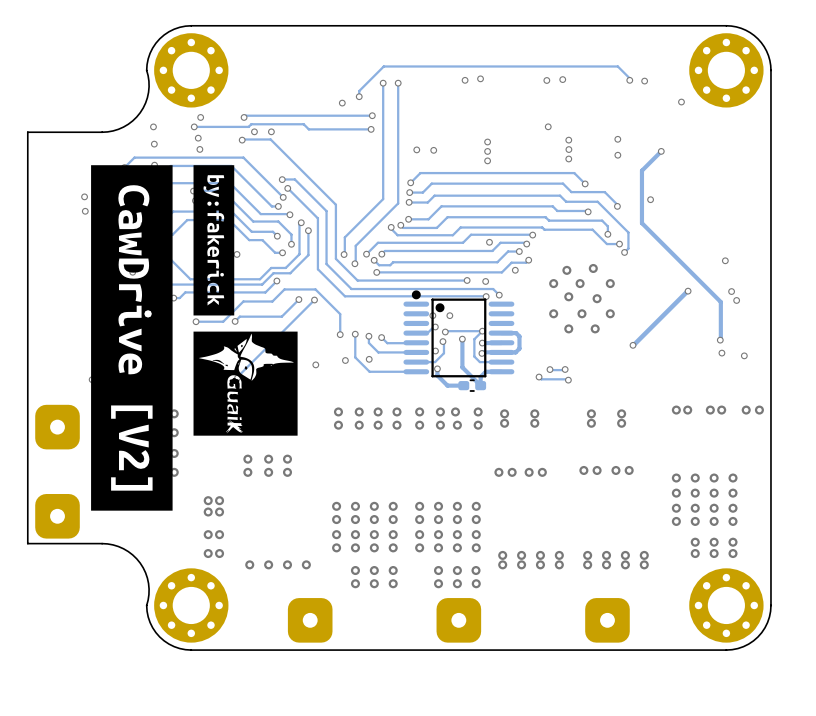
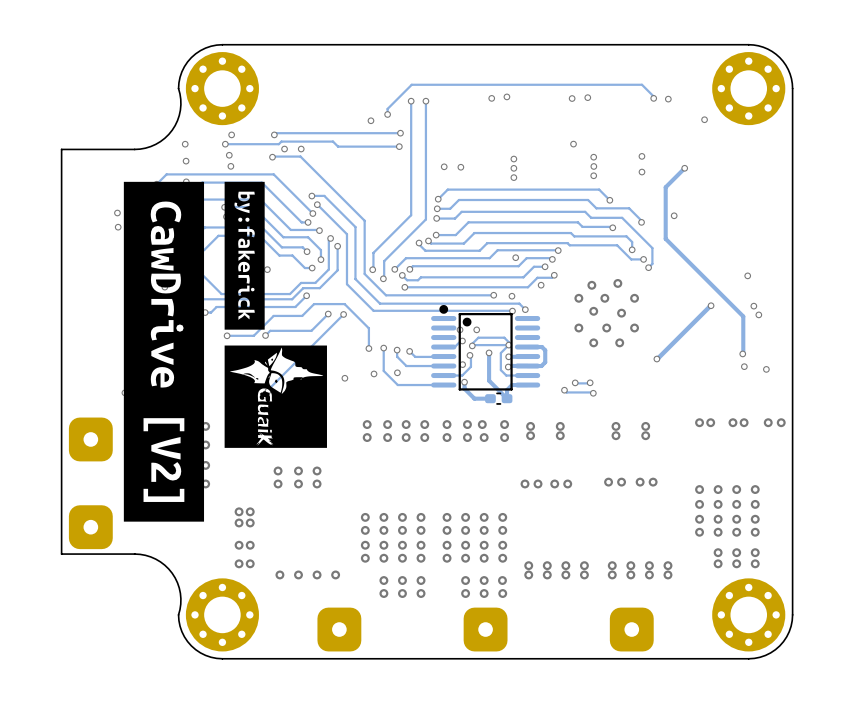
track: none -> (508, 345) (508, 342) (504, 337) (478, 337) (472, 345)

